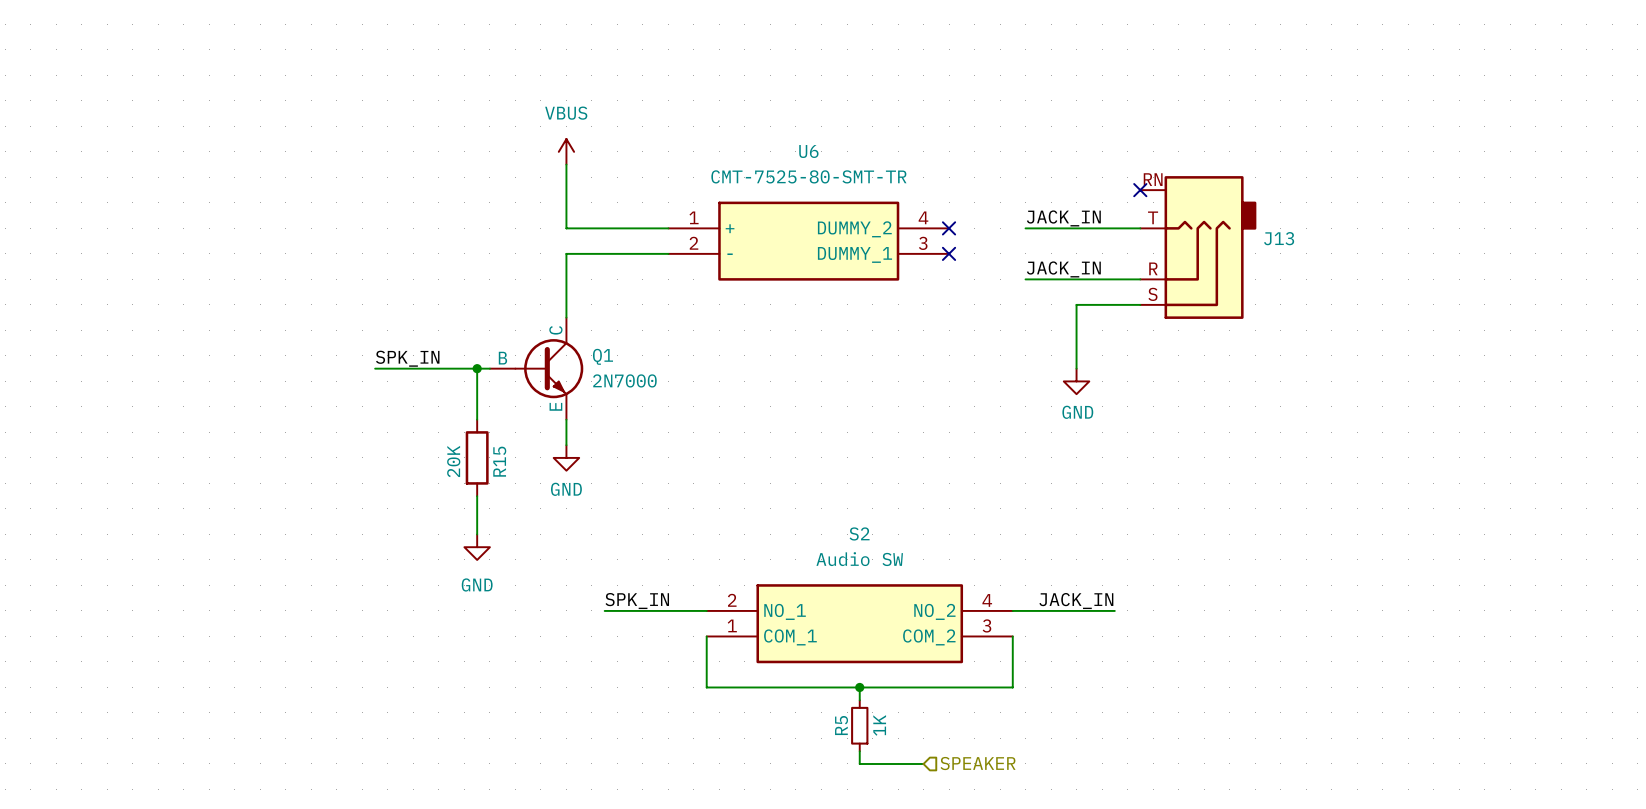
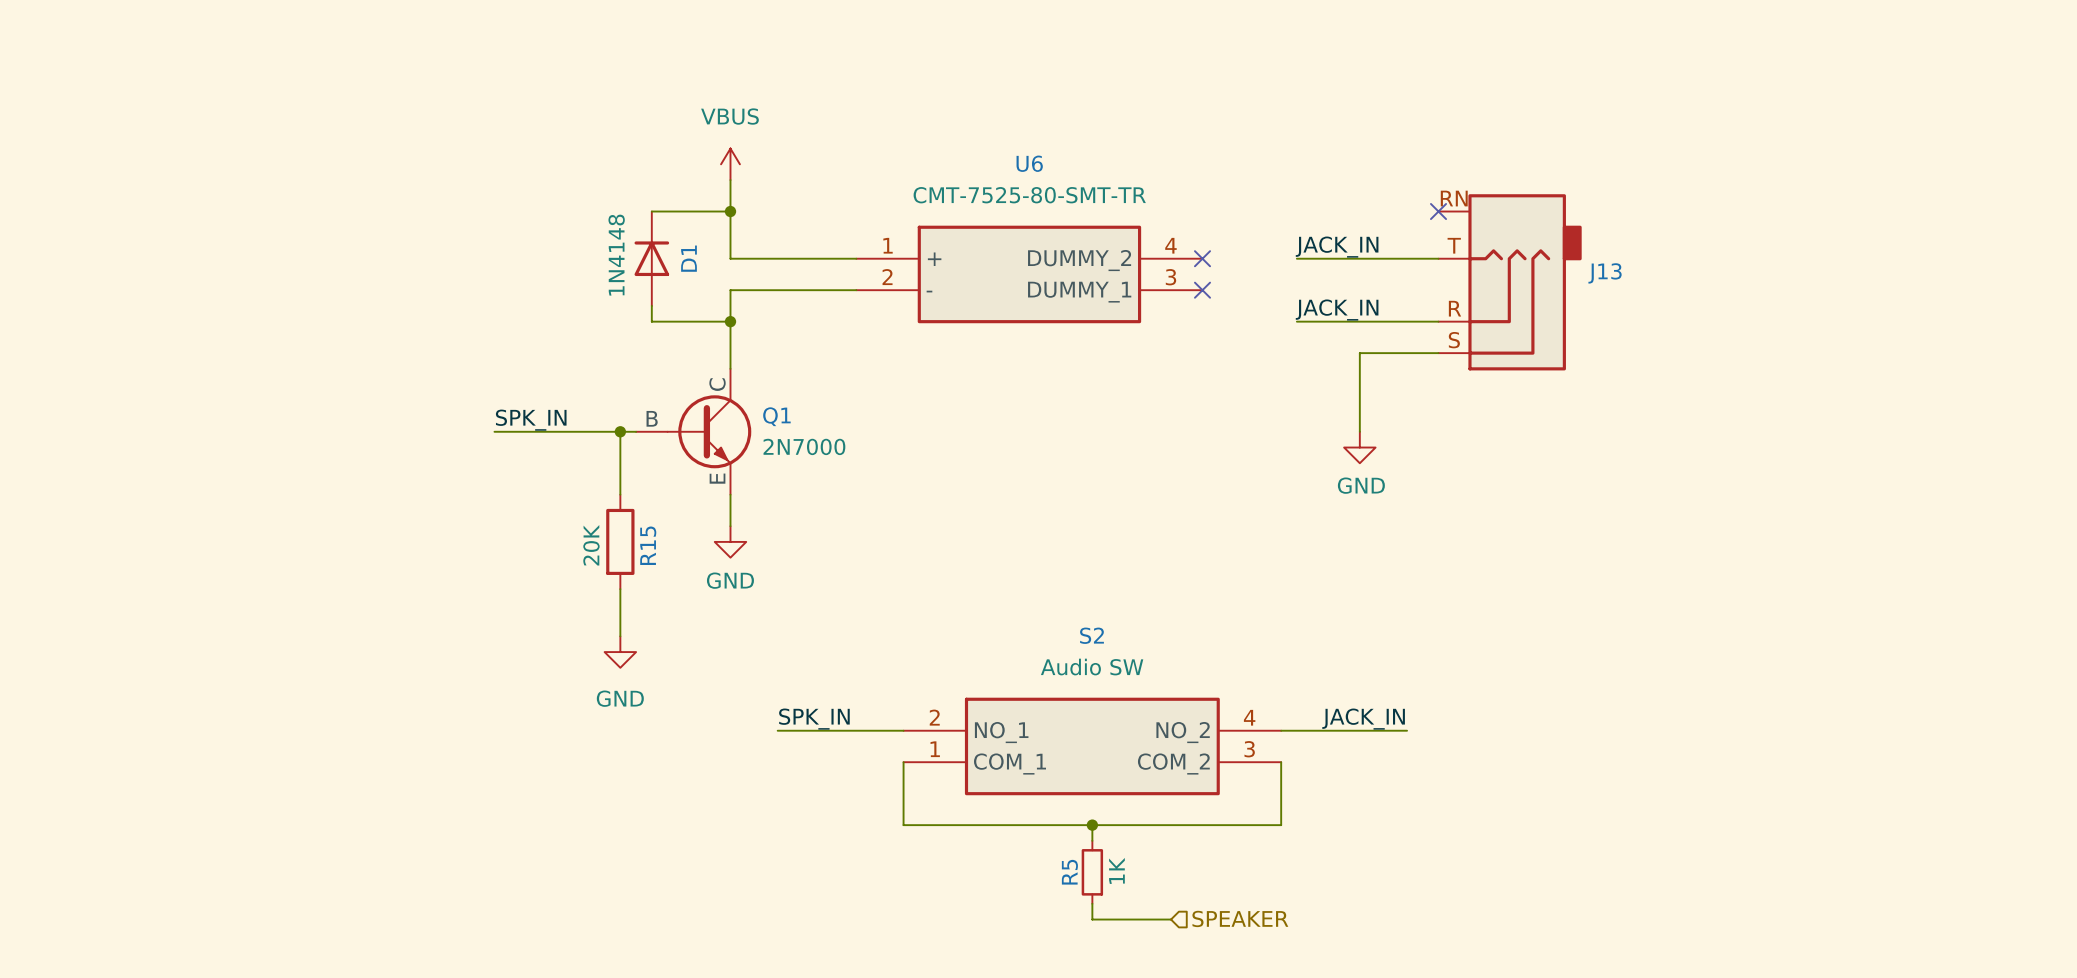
wire: none -> (651, 211) (730, 211)
junction: none -> (730, 211)
D1: none -> 1N4148 (651, 258)
wire: none -> (651, 305) (651, 321) (730, 321)
junction: none -> (730, 321)

